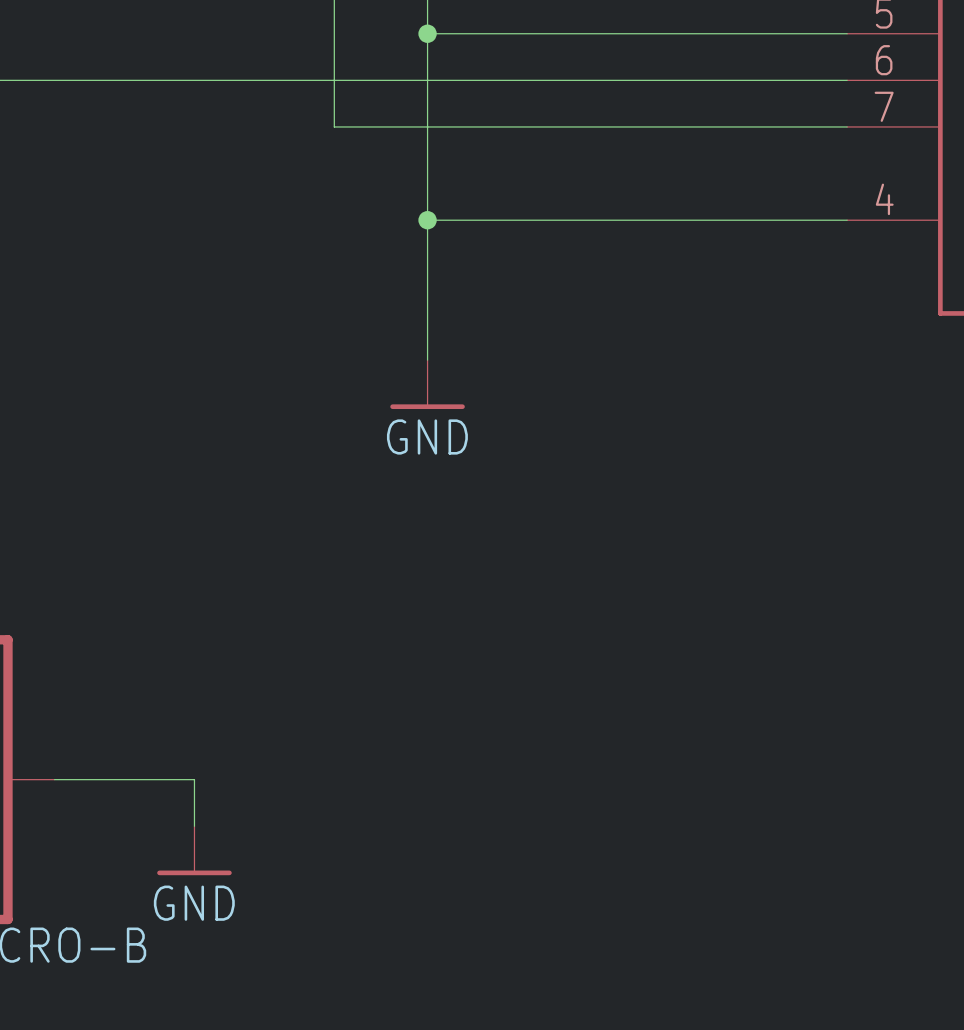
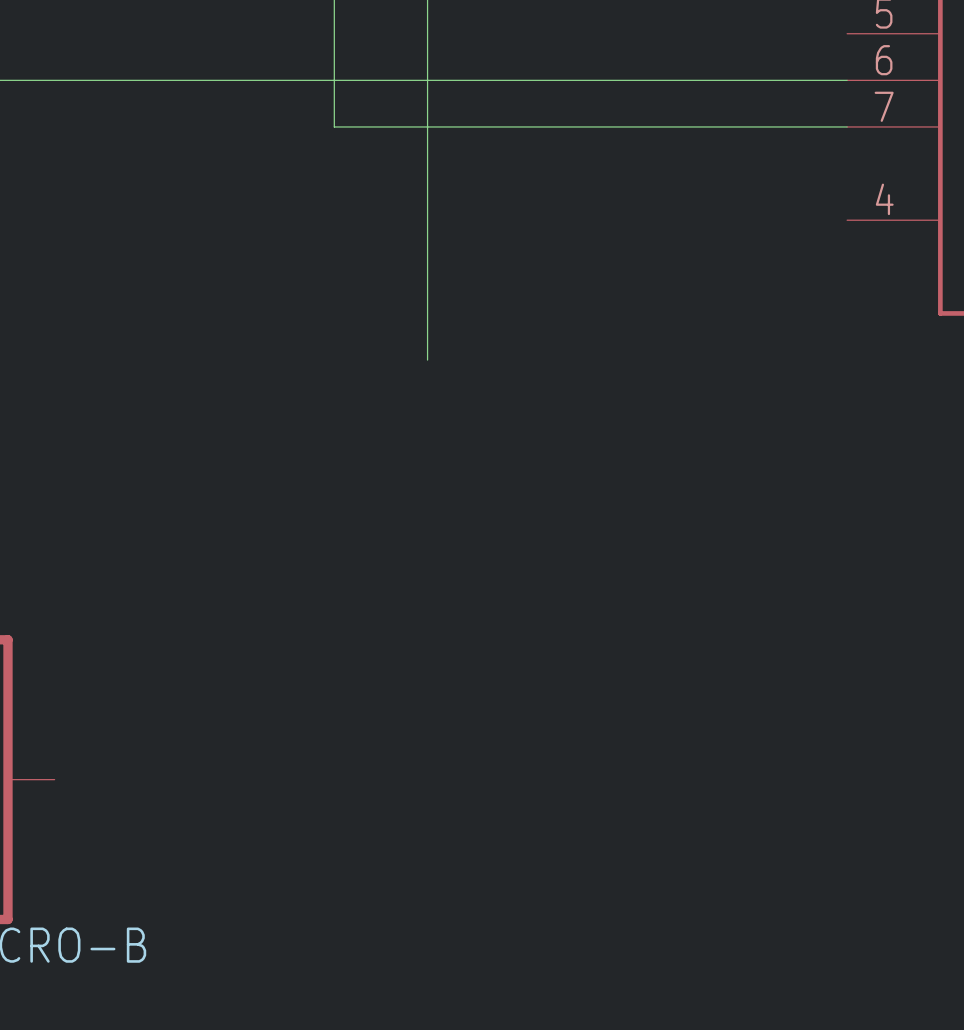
wire: (427, 33) (847, 33) -> none
junction: (427, 33) -> none
wire: (427, 220) (847, 220) -> none
junction: (427, 220) -> none
power symbol: GND (427, 384) -> none
wire: (54, 779) (194, 779) (194, 826) -> none
power symbol: GND (194, 850) -> none

